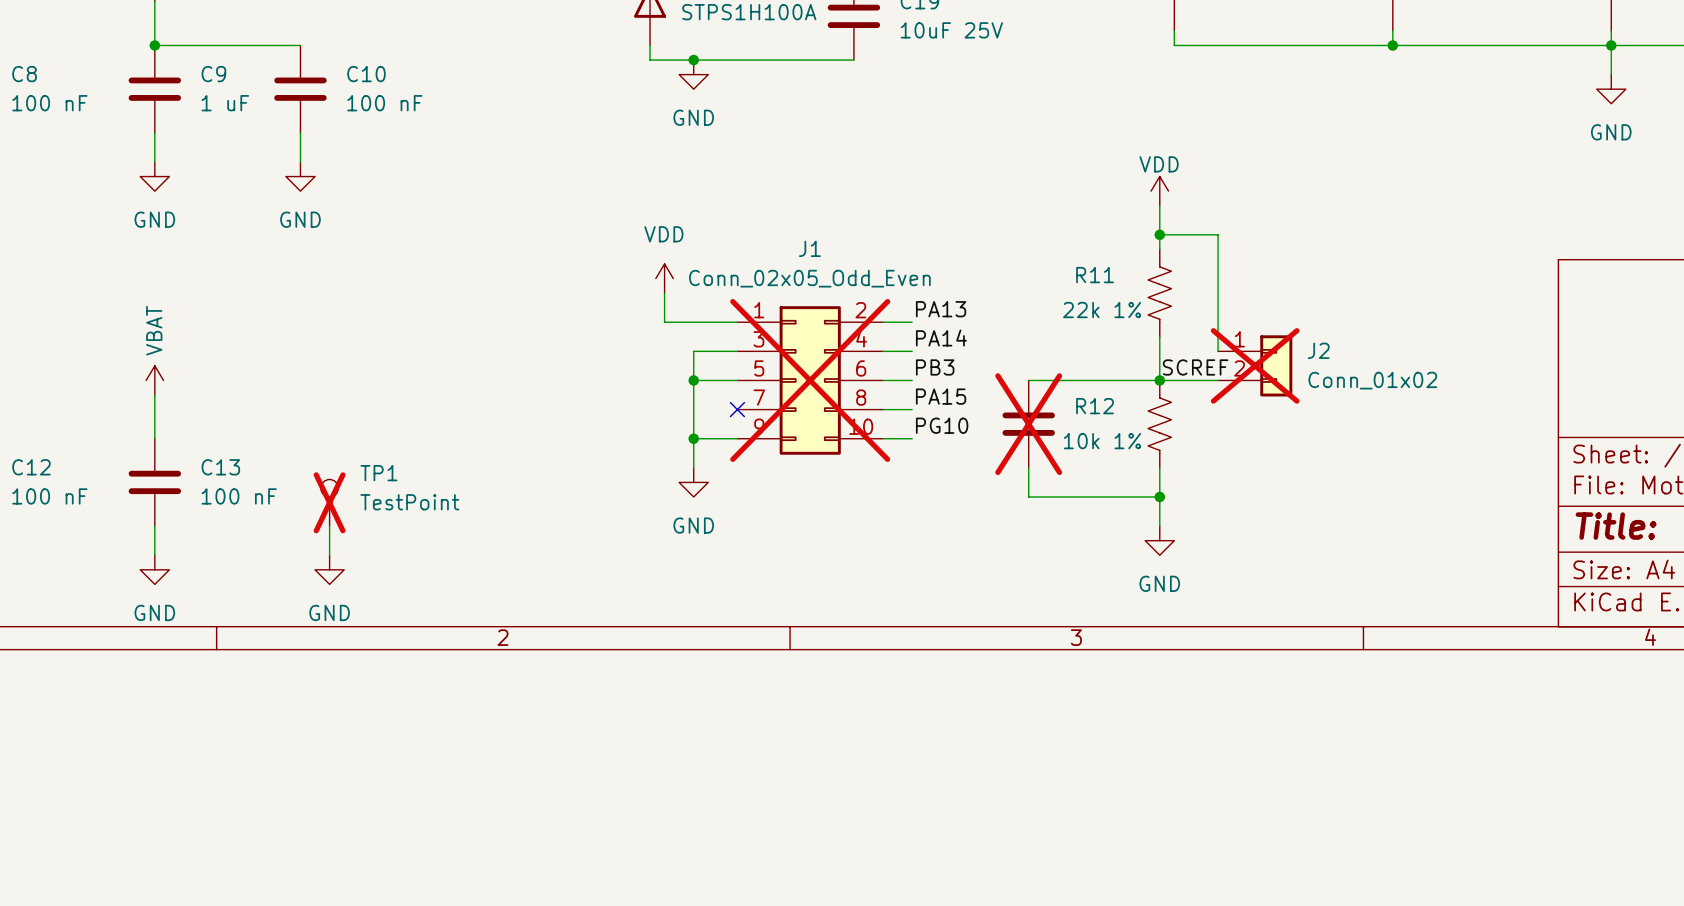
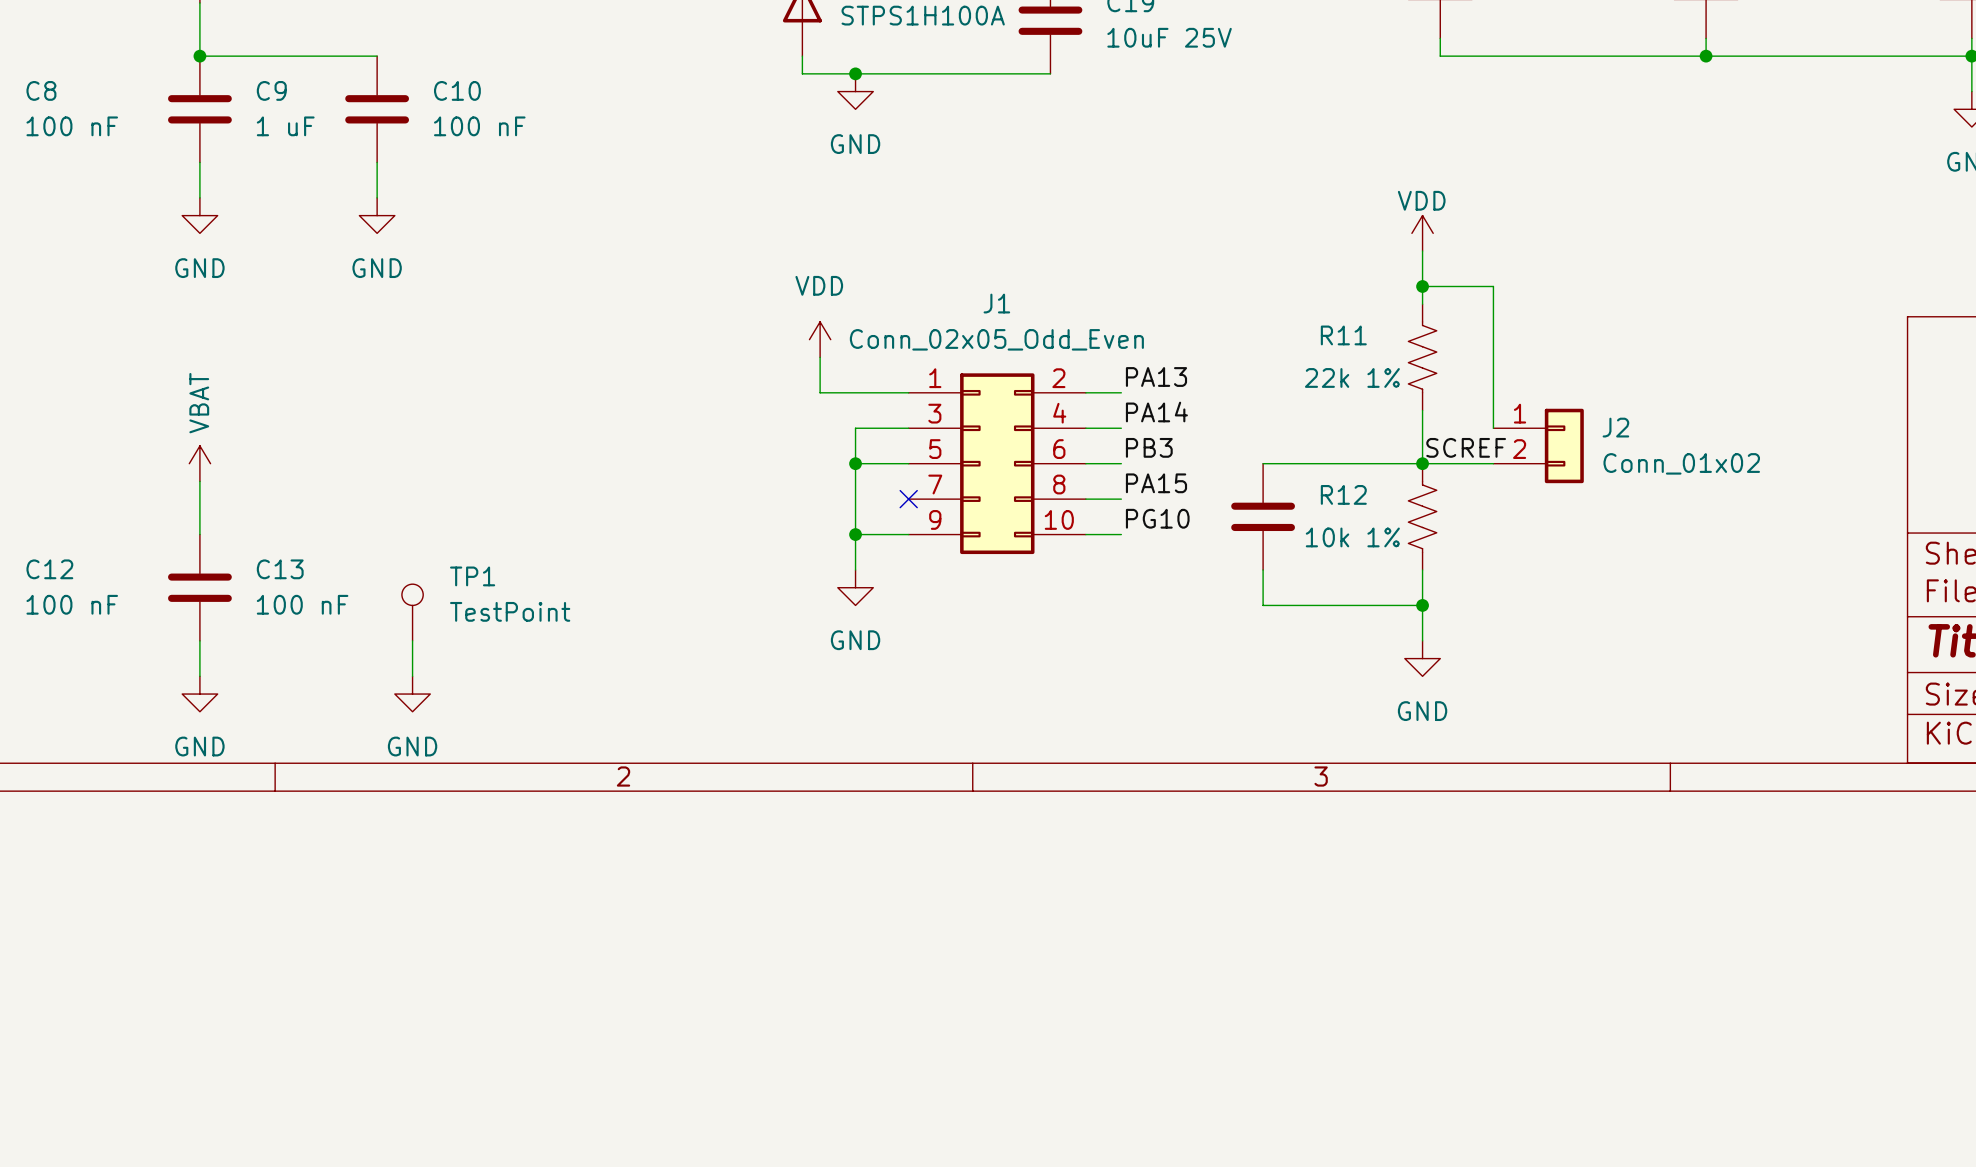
J2 do-not-place cross: (1255, 365) -> none
J1 do-not-place cross: (810, 380) -> none
part do-not-place cross: (1028, 424) -> none
TP1 do-not-place cross: (329, 502) -> none

